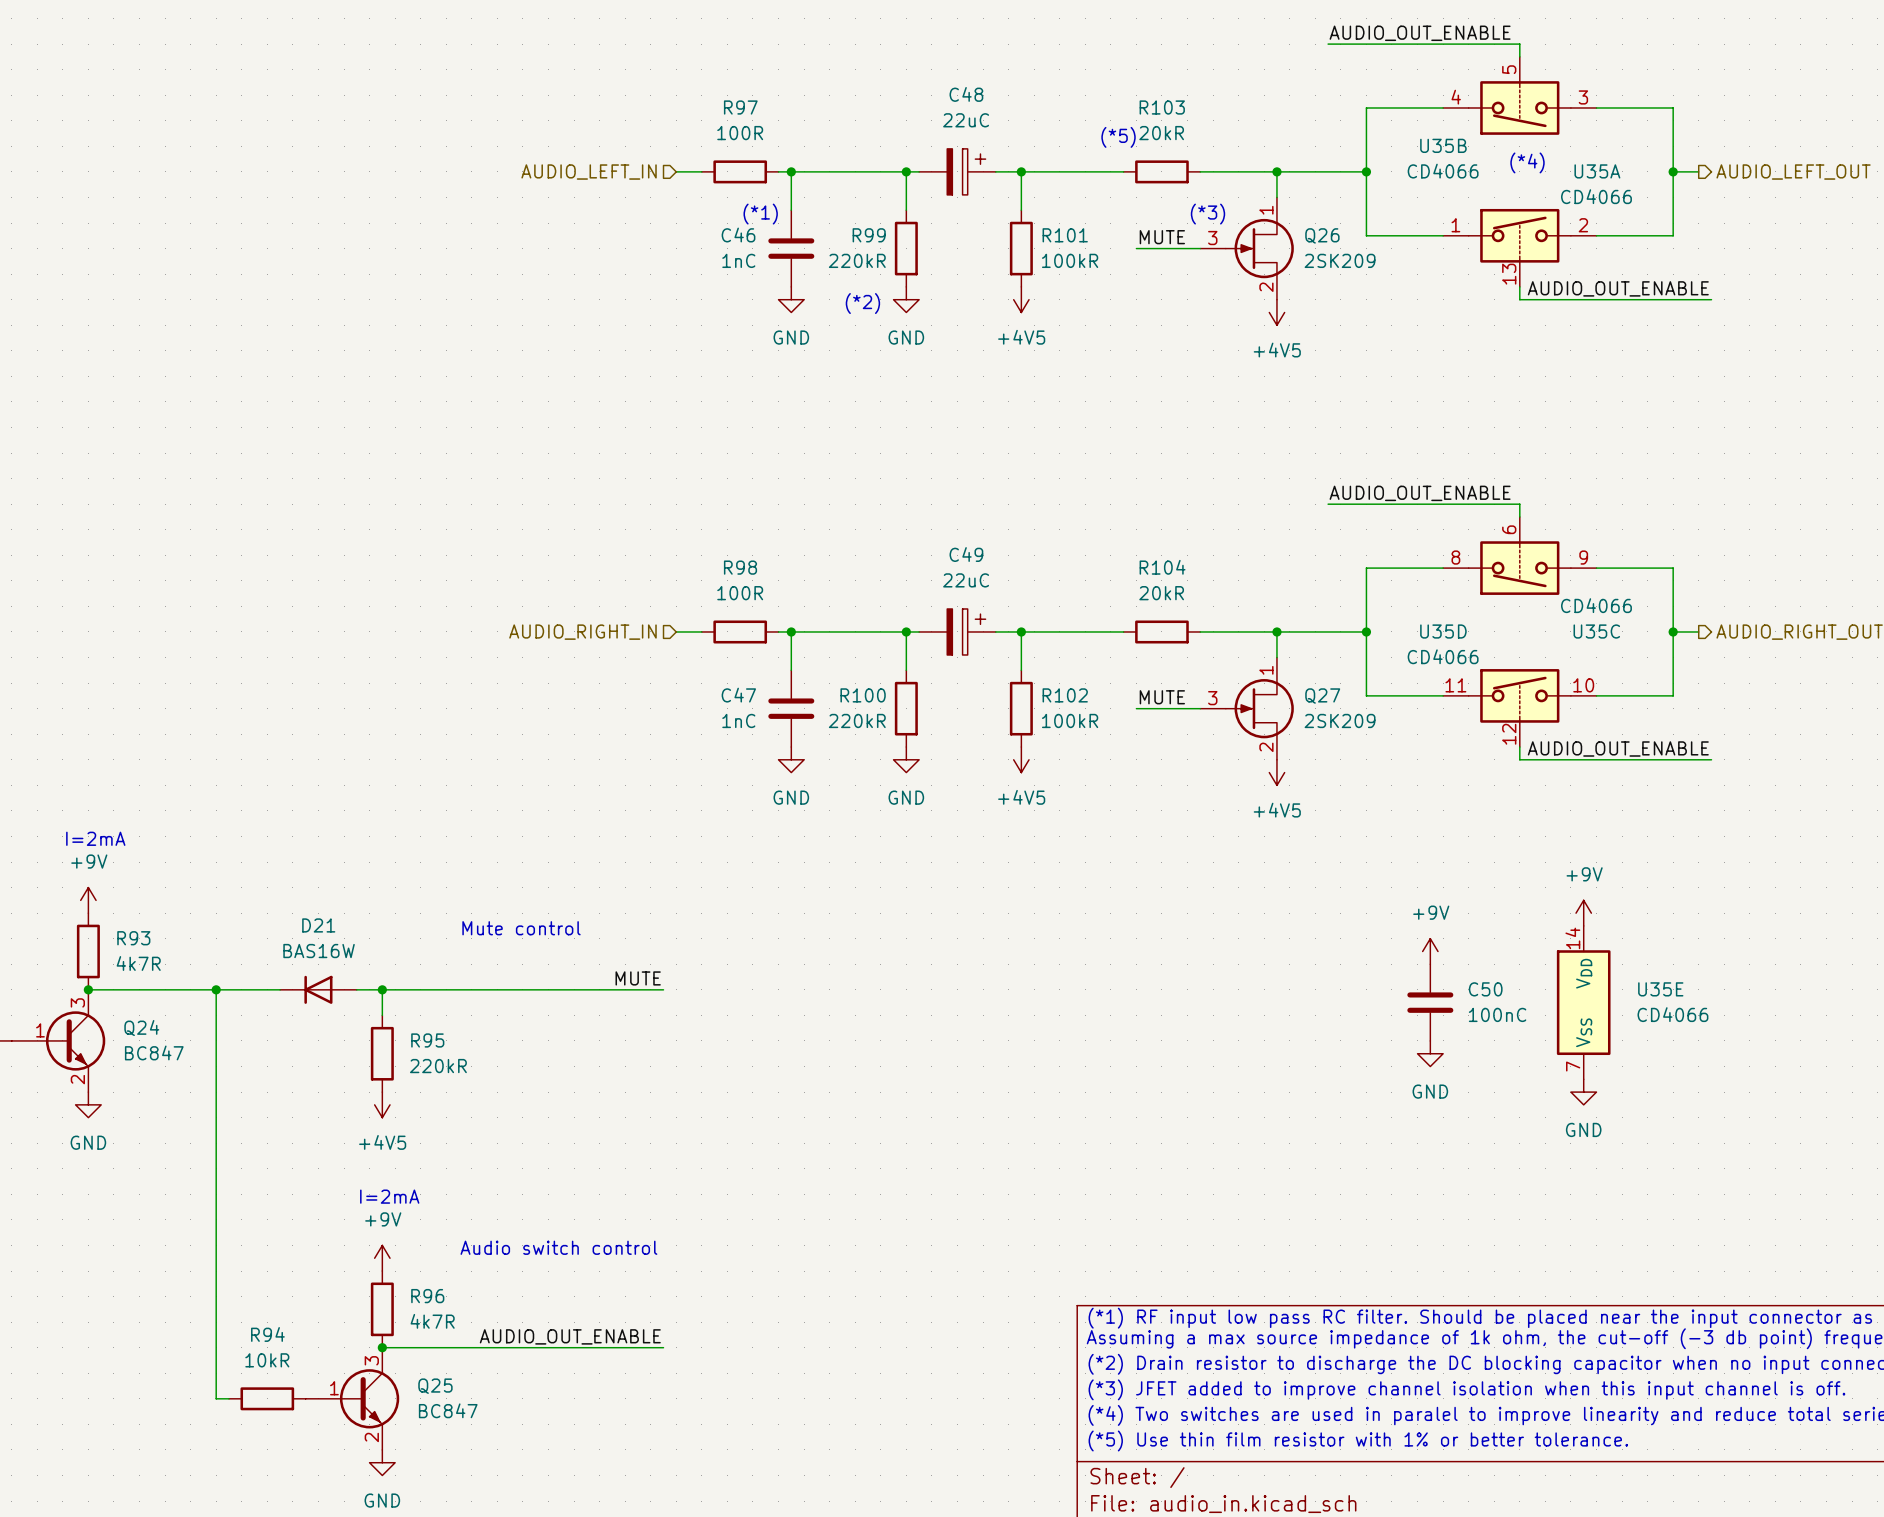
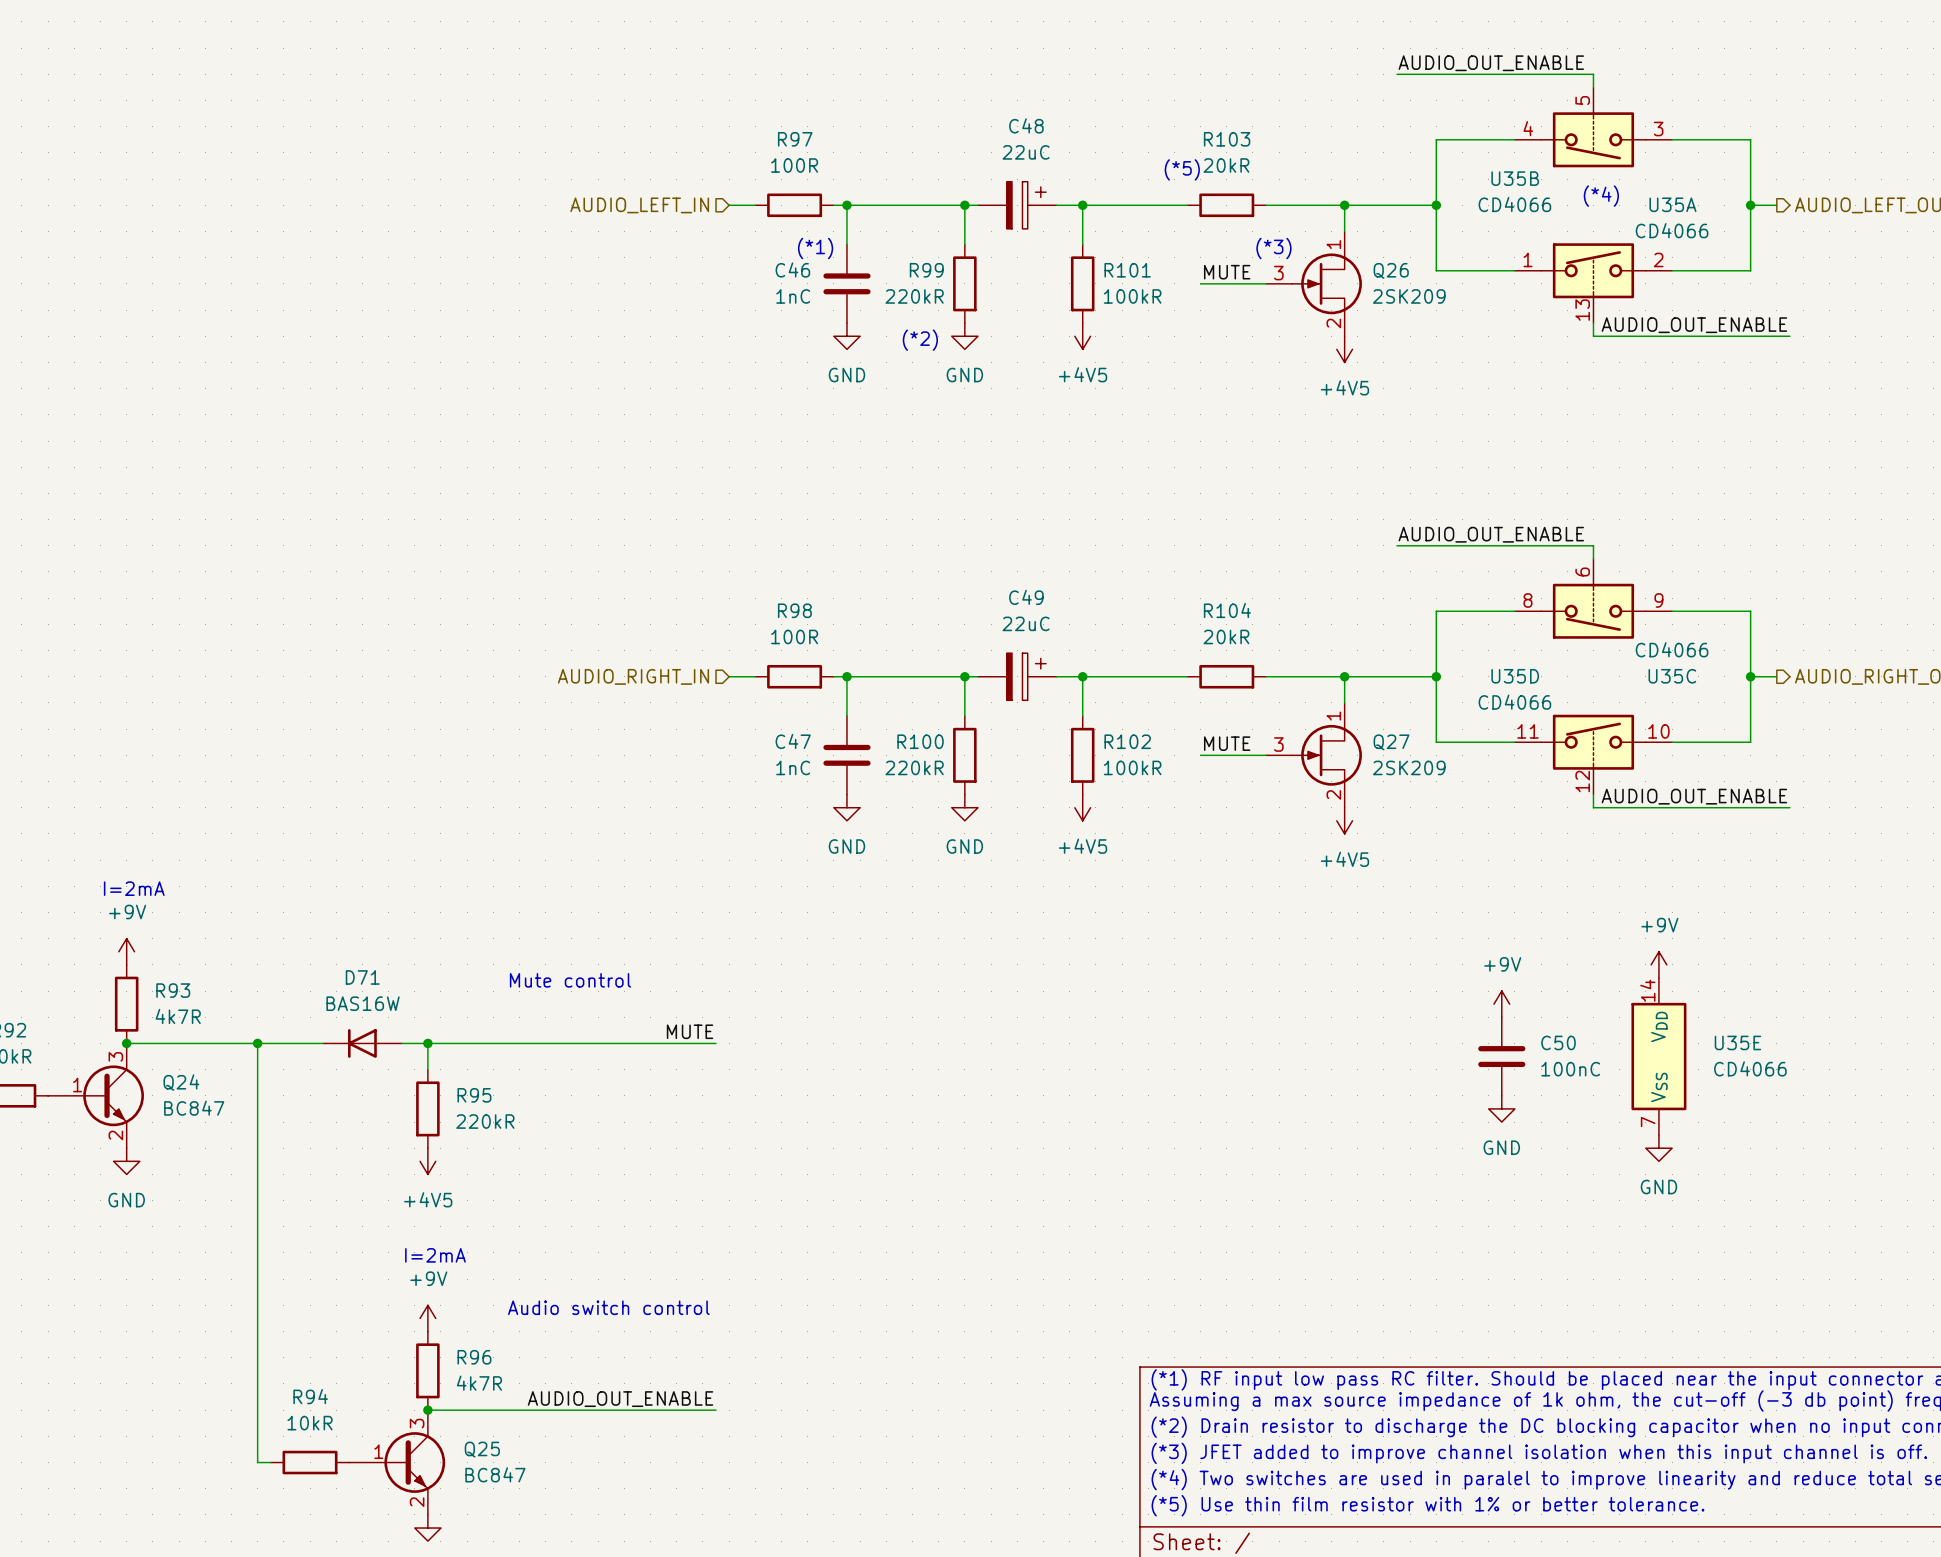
D21 name: D21 (318, 925) -> D71 (362, 977)

